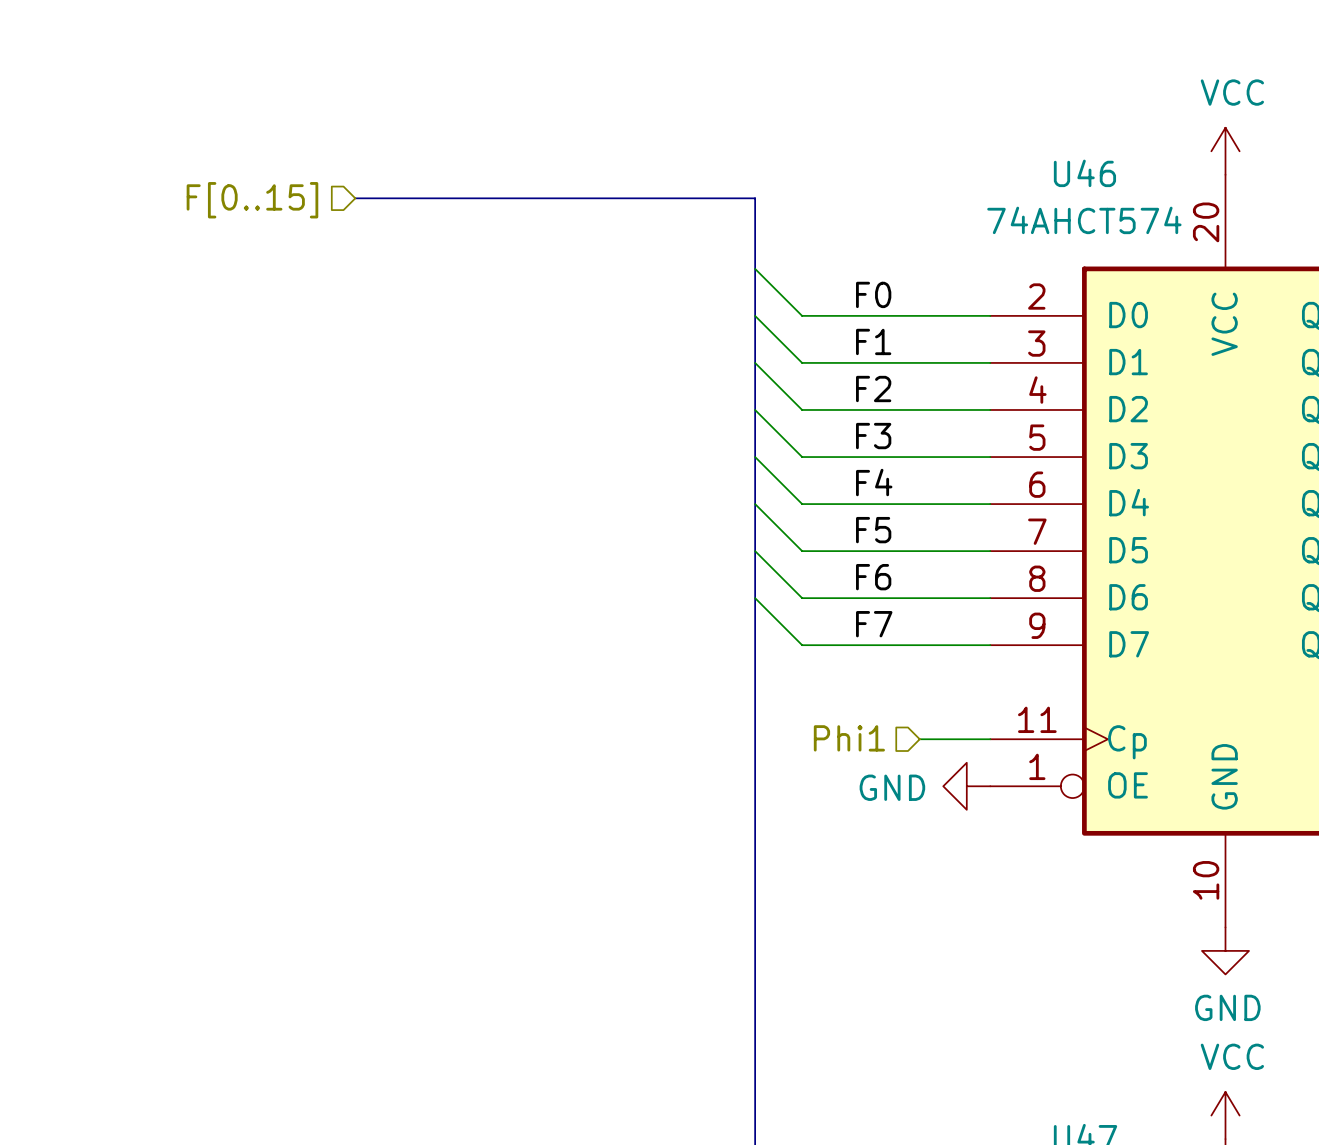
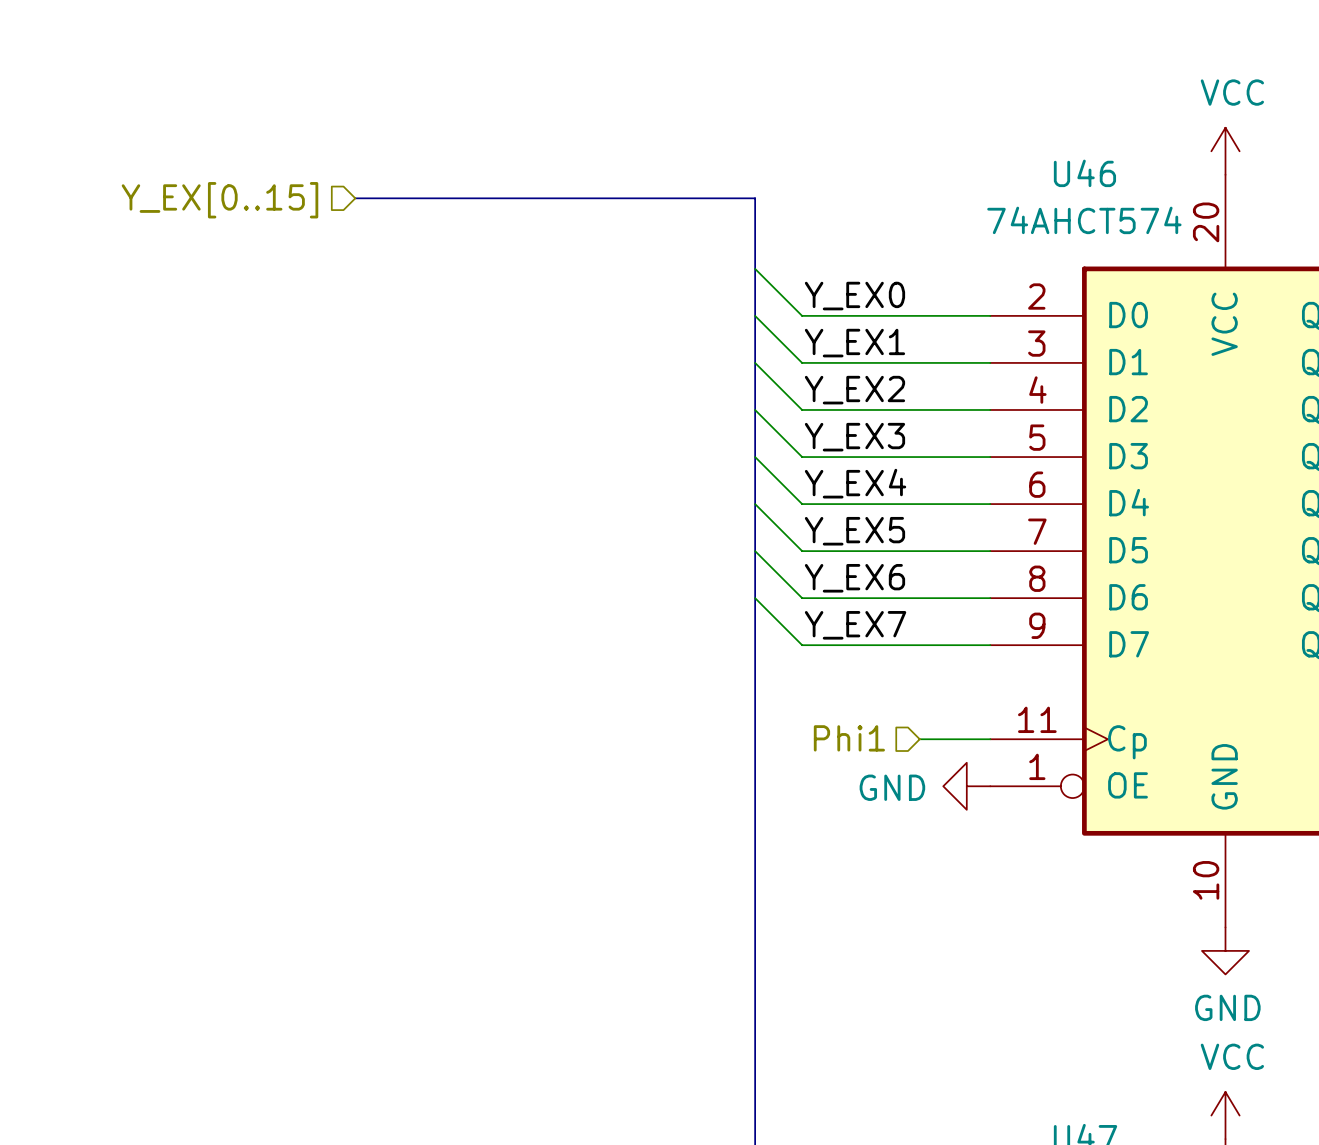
hierarchical label: F[0..15] (252, 200) -> Y_EX[0..15] (219, 200)
label: F0 (873, 294) -> none
label: none -> Y_EX0 (854, 296)
label: F1 (873, 341) -> none
label: none -> Y_EX1 (854, 343)
label: F2 (873, 389) -> none
label: none -> Y_EX2 (854, 390)
label: F3 (873, 436) -> none
label: none -> Y_EX3 (854, 437)
label: F4 (874, 482) -> none
label: none -> Y_EX4 (855, 483)
label: F5 (873, 530) -> none
label: none -> Y_EX5 (854, 531)
label: F6 (873, 577) -> none
label: none -> Y_EX6 (854, 578)
label: F7 (874, 624) -> none
label: none -> Y_EX7 (855, 625)

